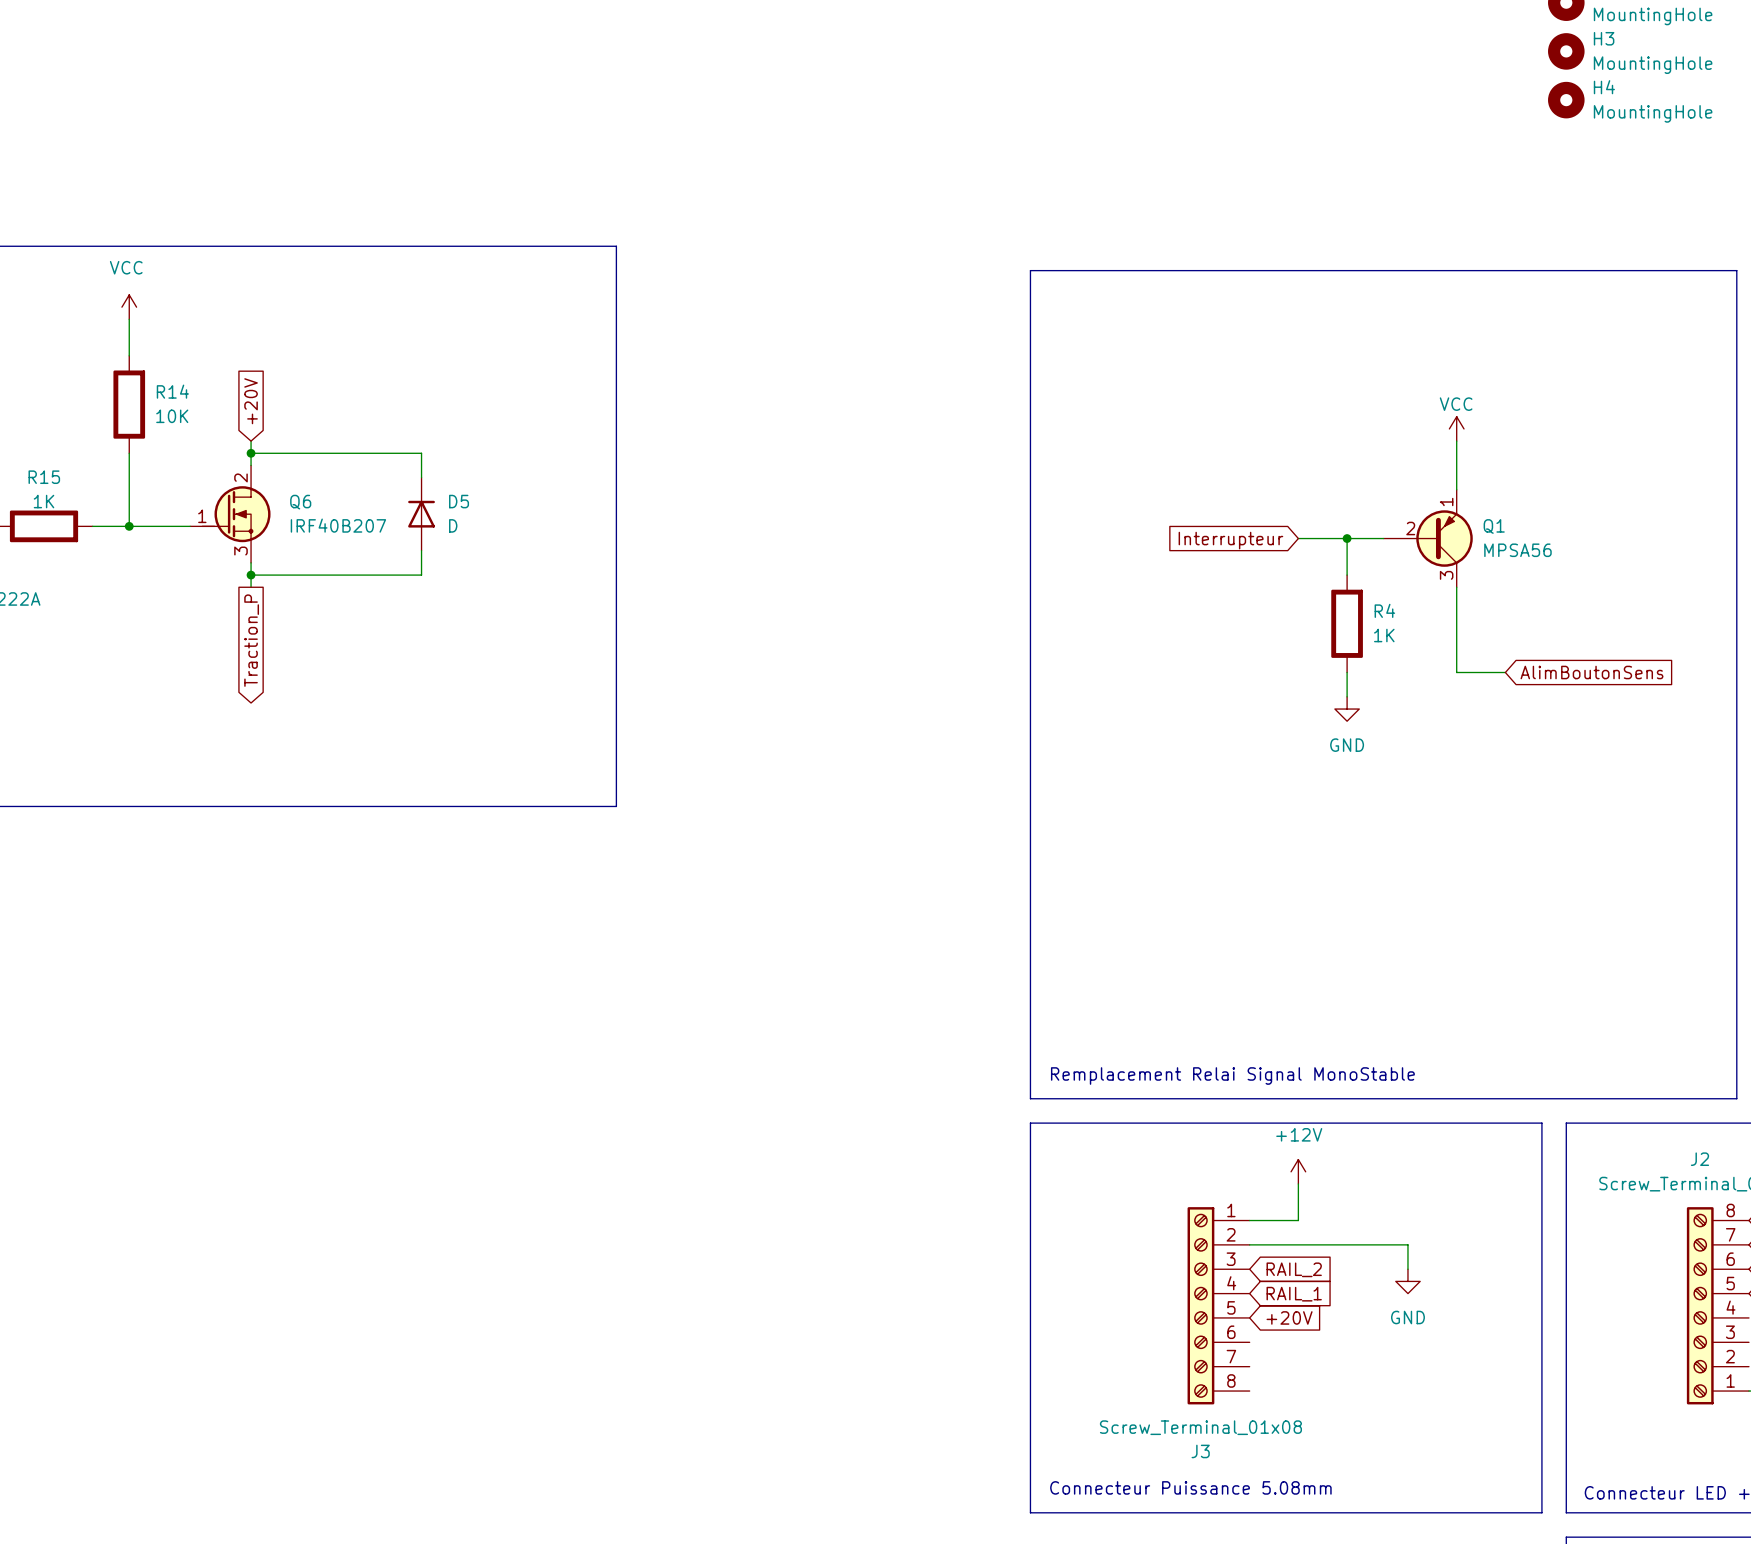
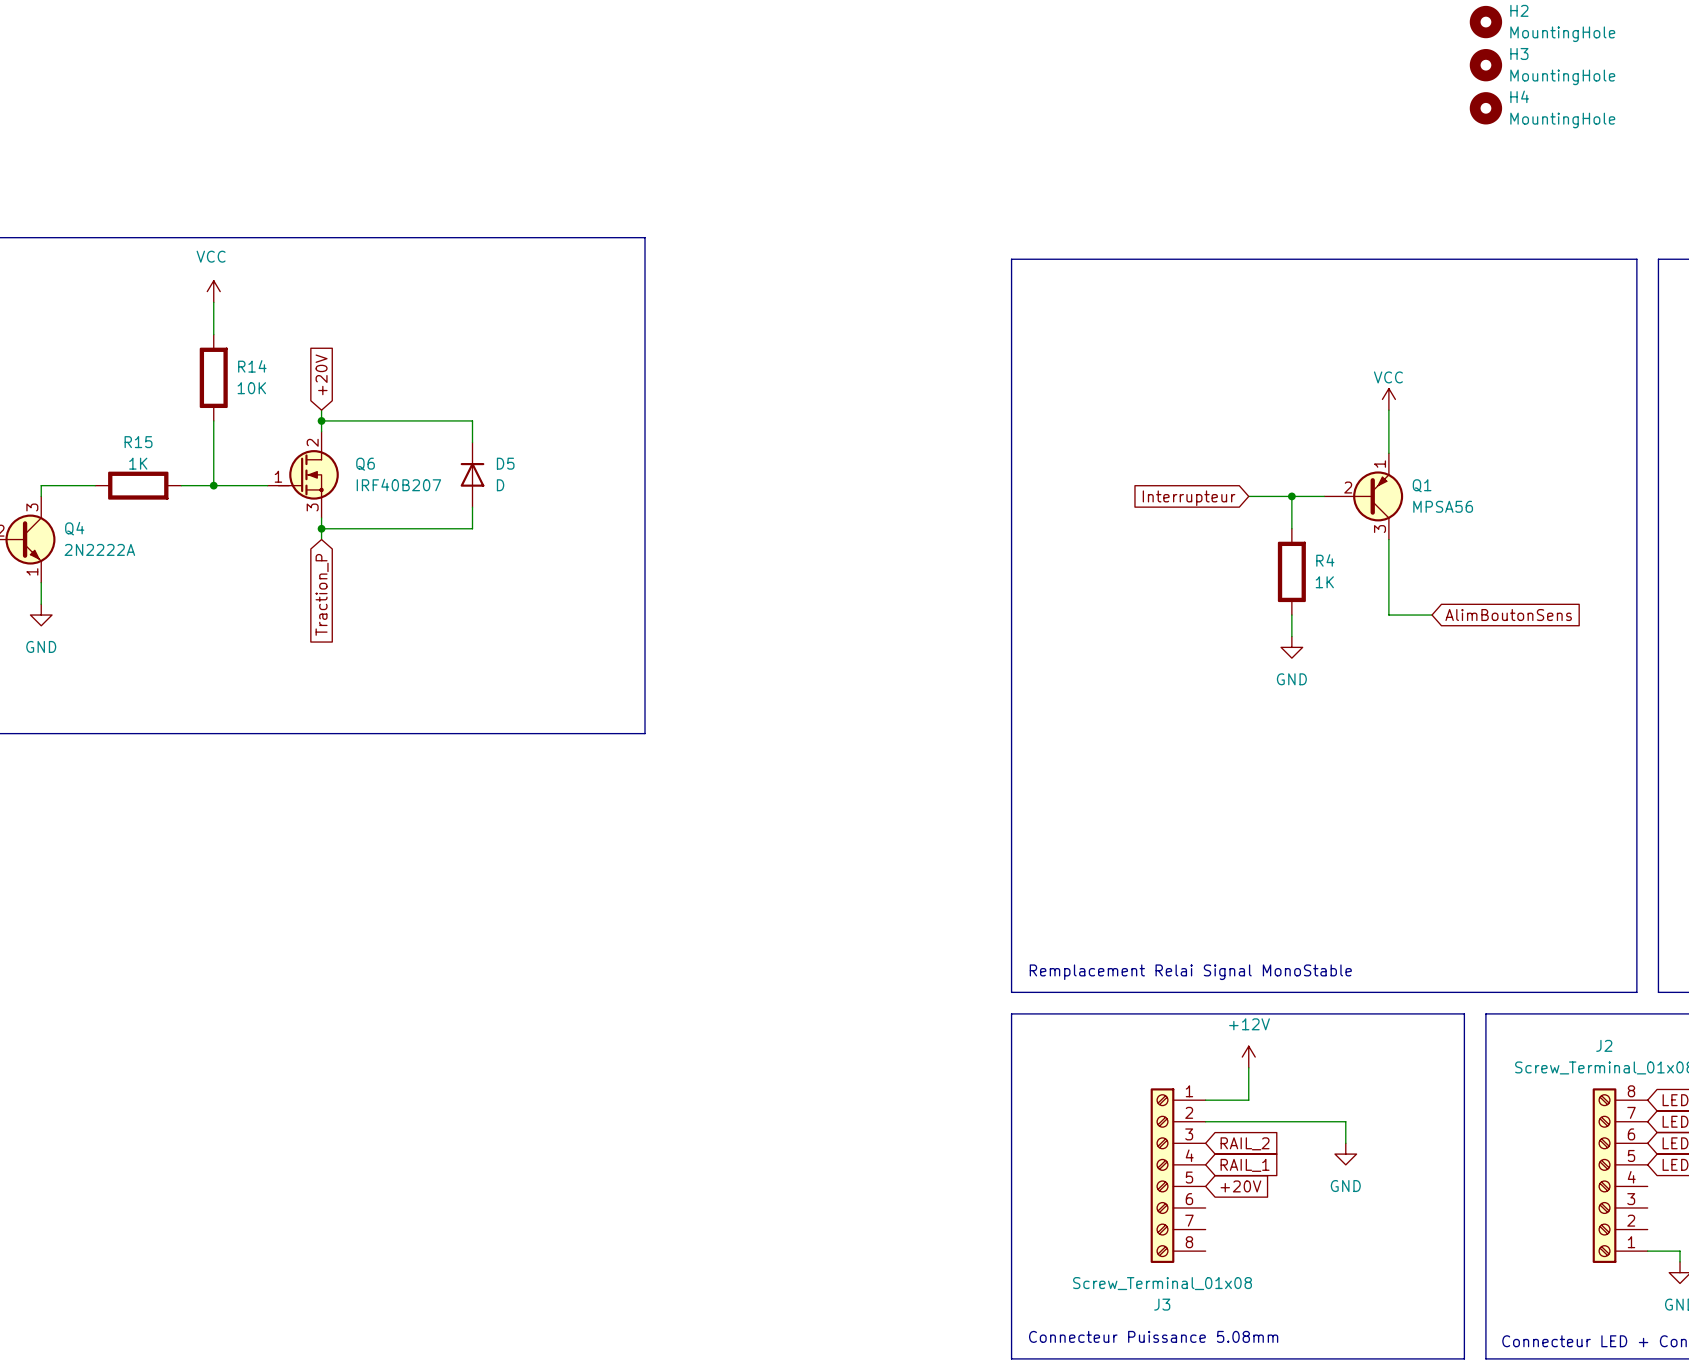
global label shape: output (251, 640) -> input (322, 594)

